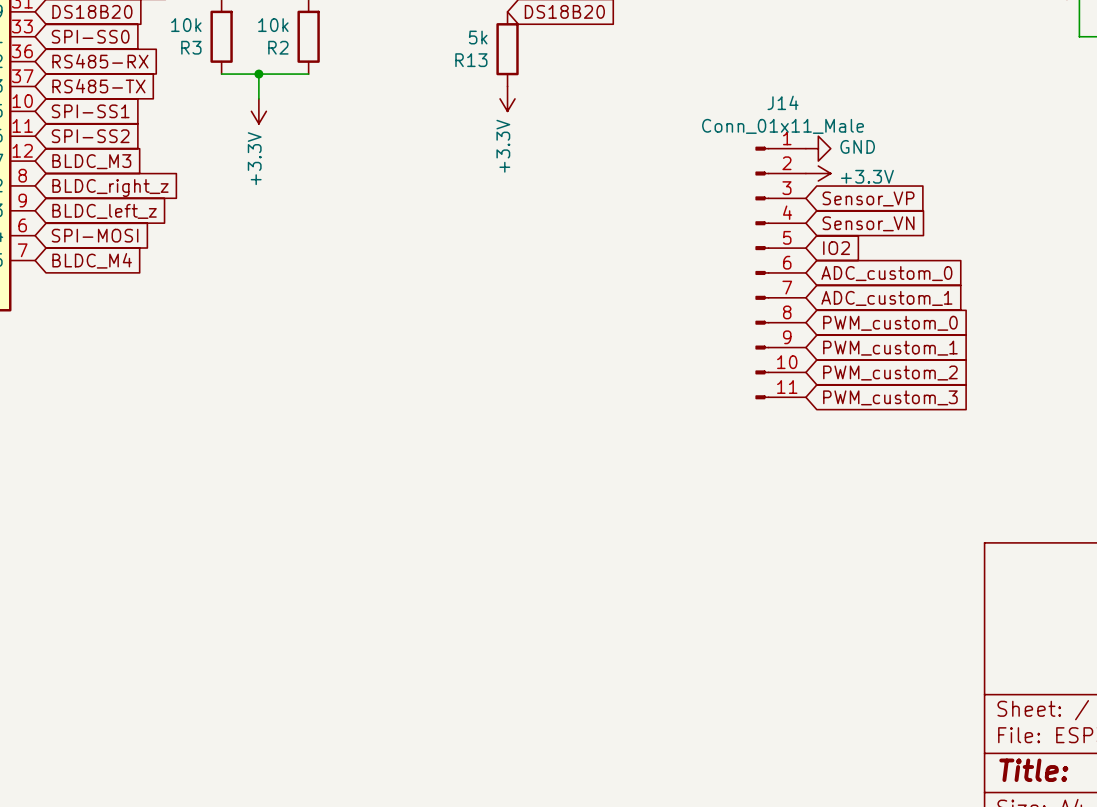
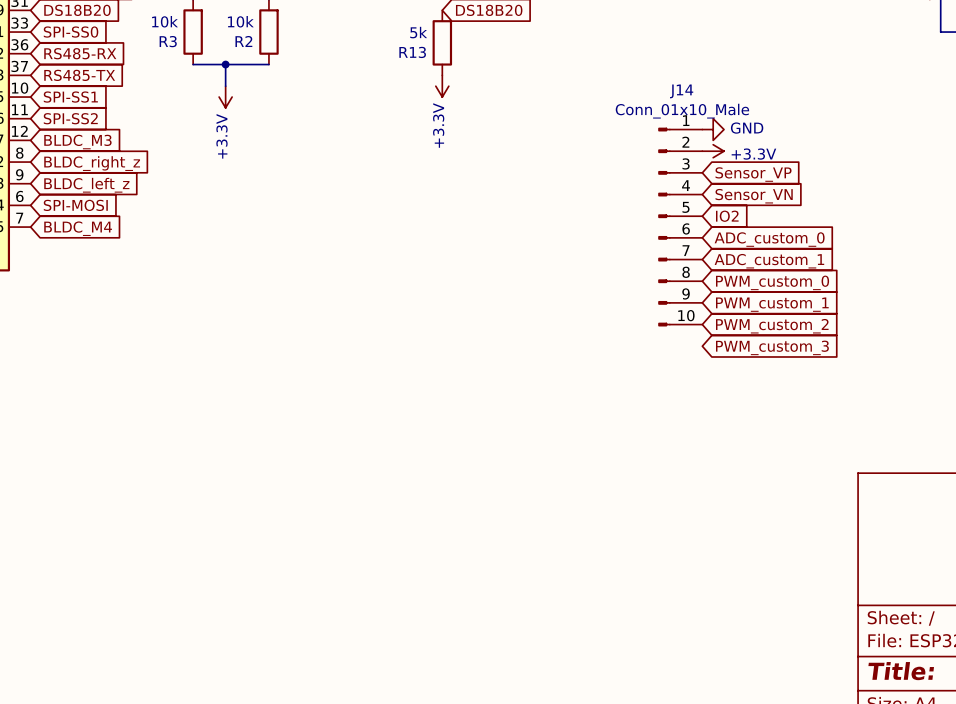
J14 value: Conn_01x11_Male (783, 126) -> Conn_01x10_Male (682, 111)
J14 symbol: [755, 146, 806, 400] -> [658, 127, 703, 327]

